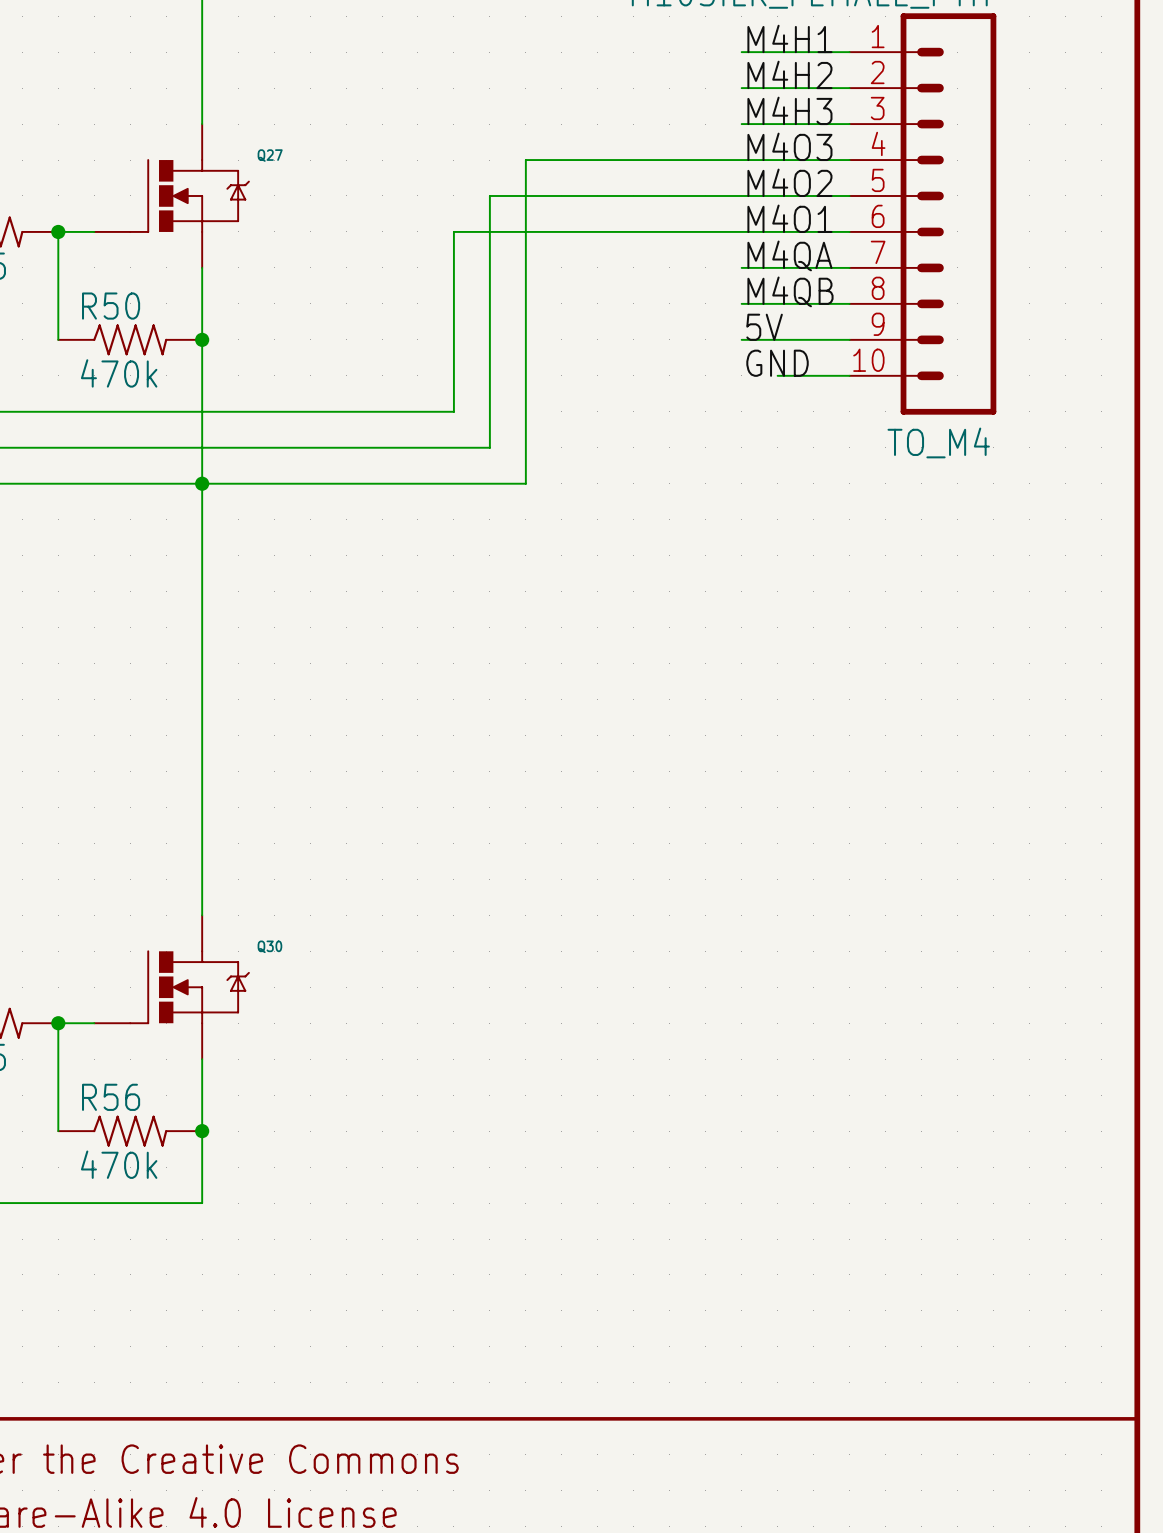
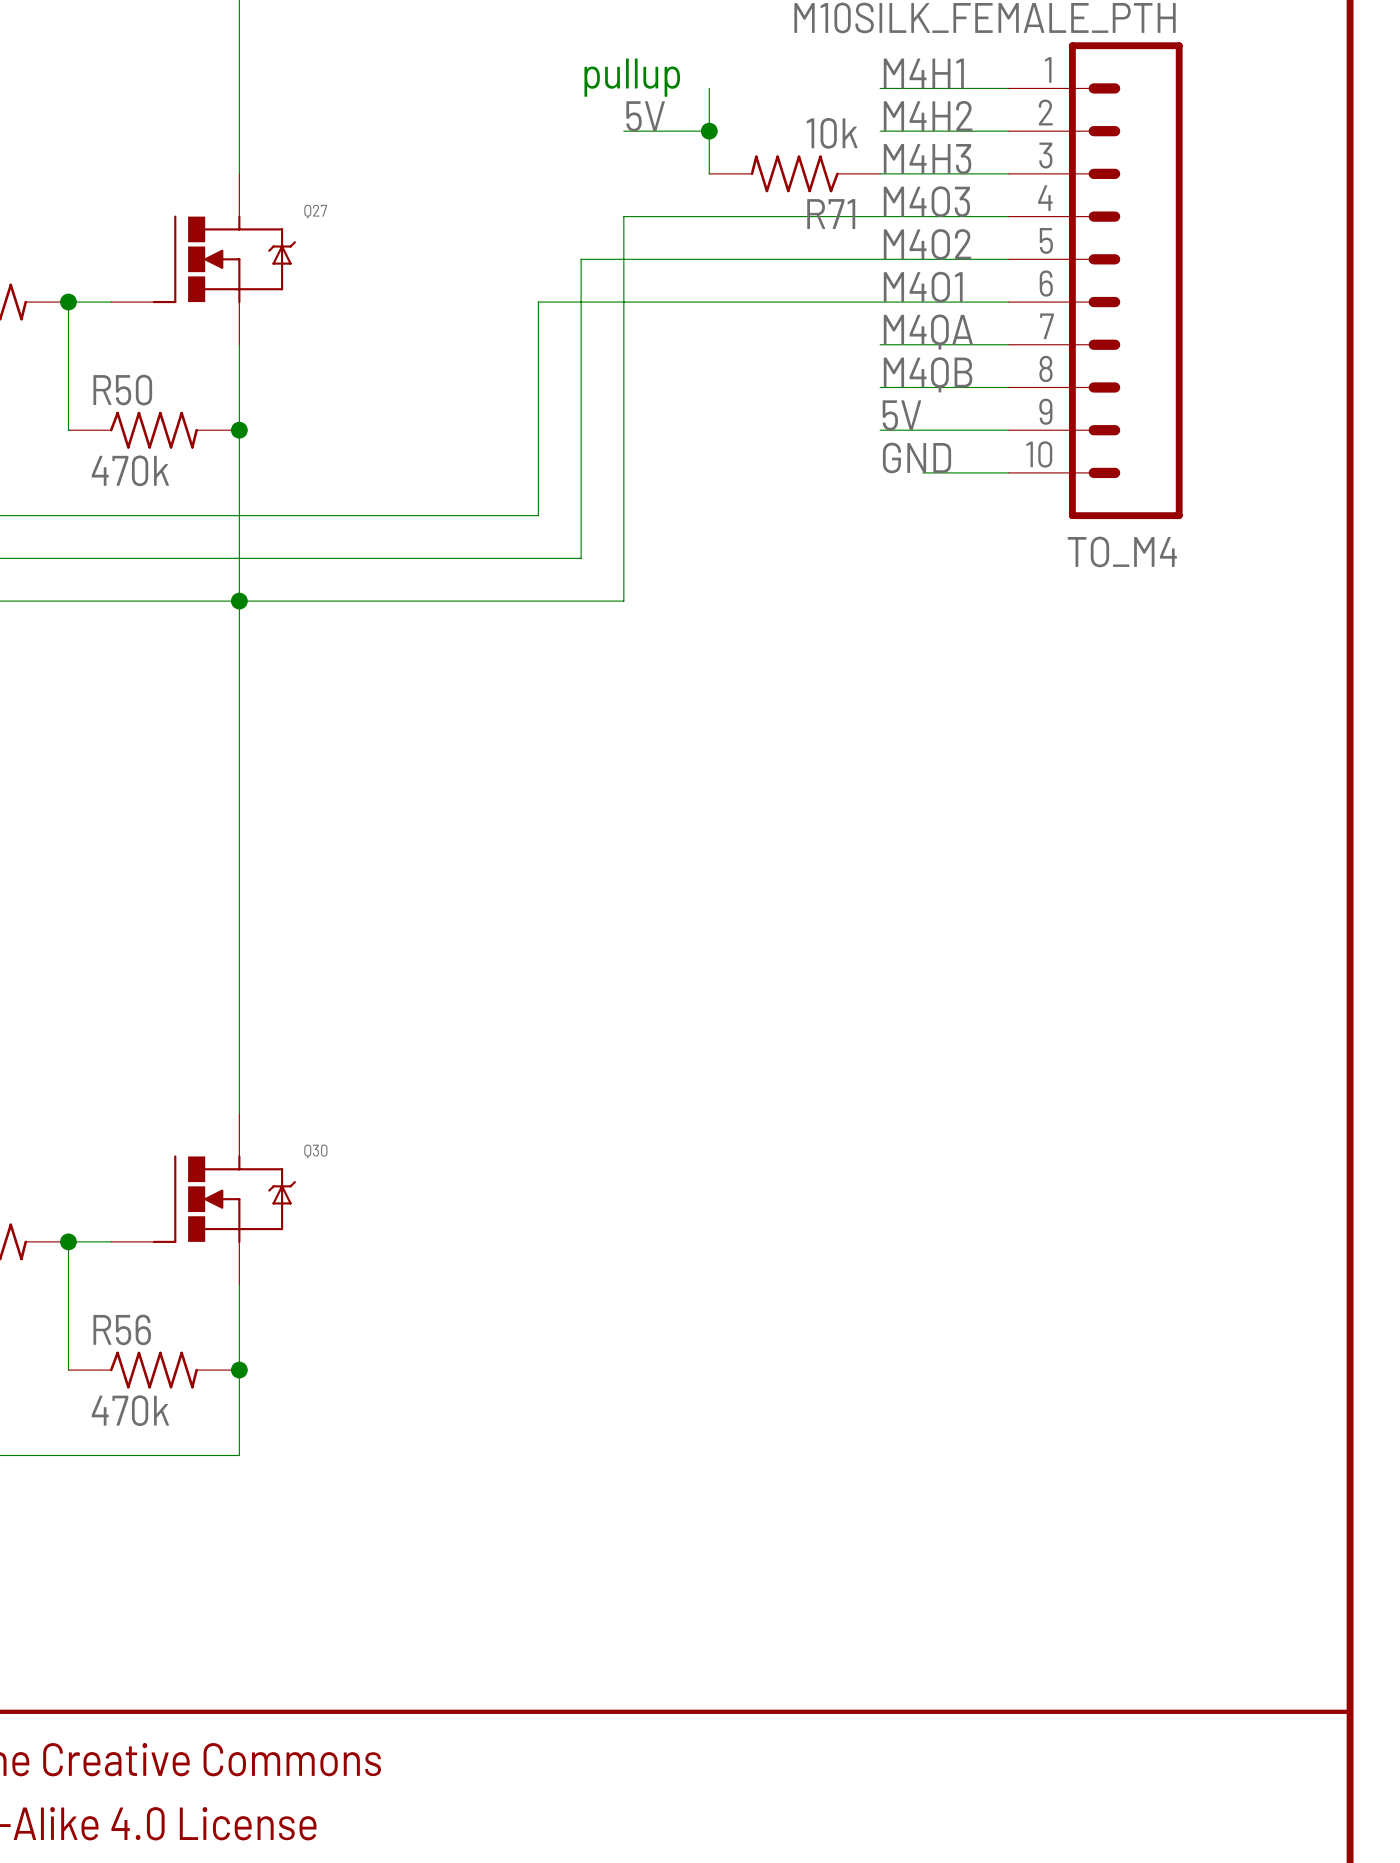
text: none -> pullup (632, 77)
wire: none -> (709, 88) (709, 173)
label: none -> 5V (645, 116)
wire: none -> (623, 131) (709, 131)
junction: none -> (709, 131)
R71: none -> 10k (794, 173)

